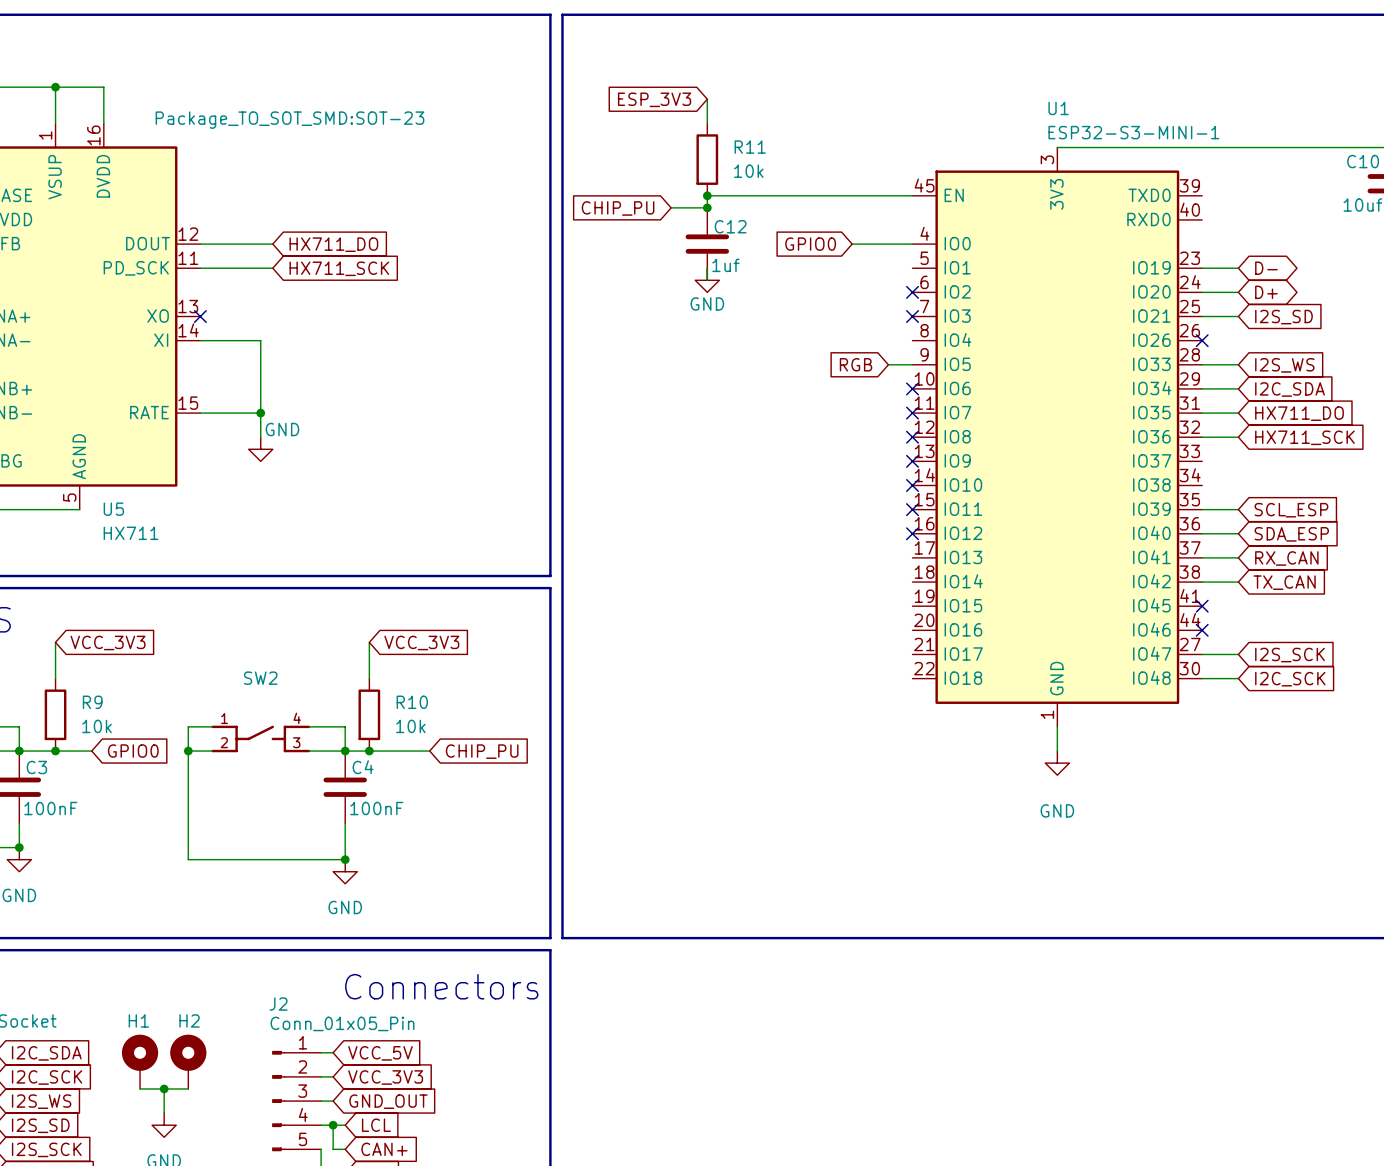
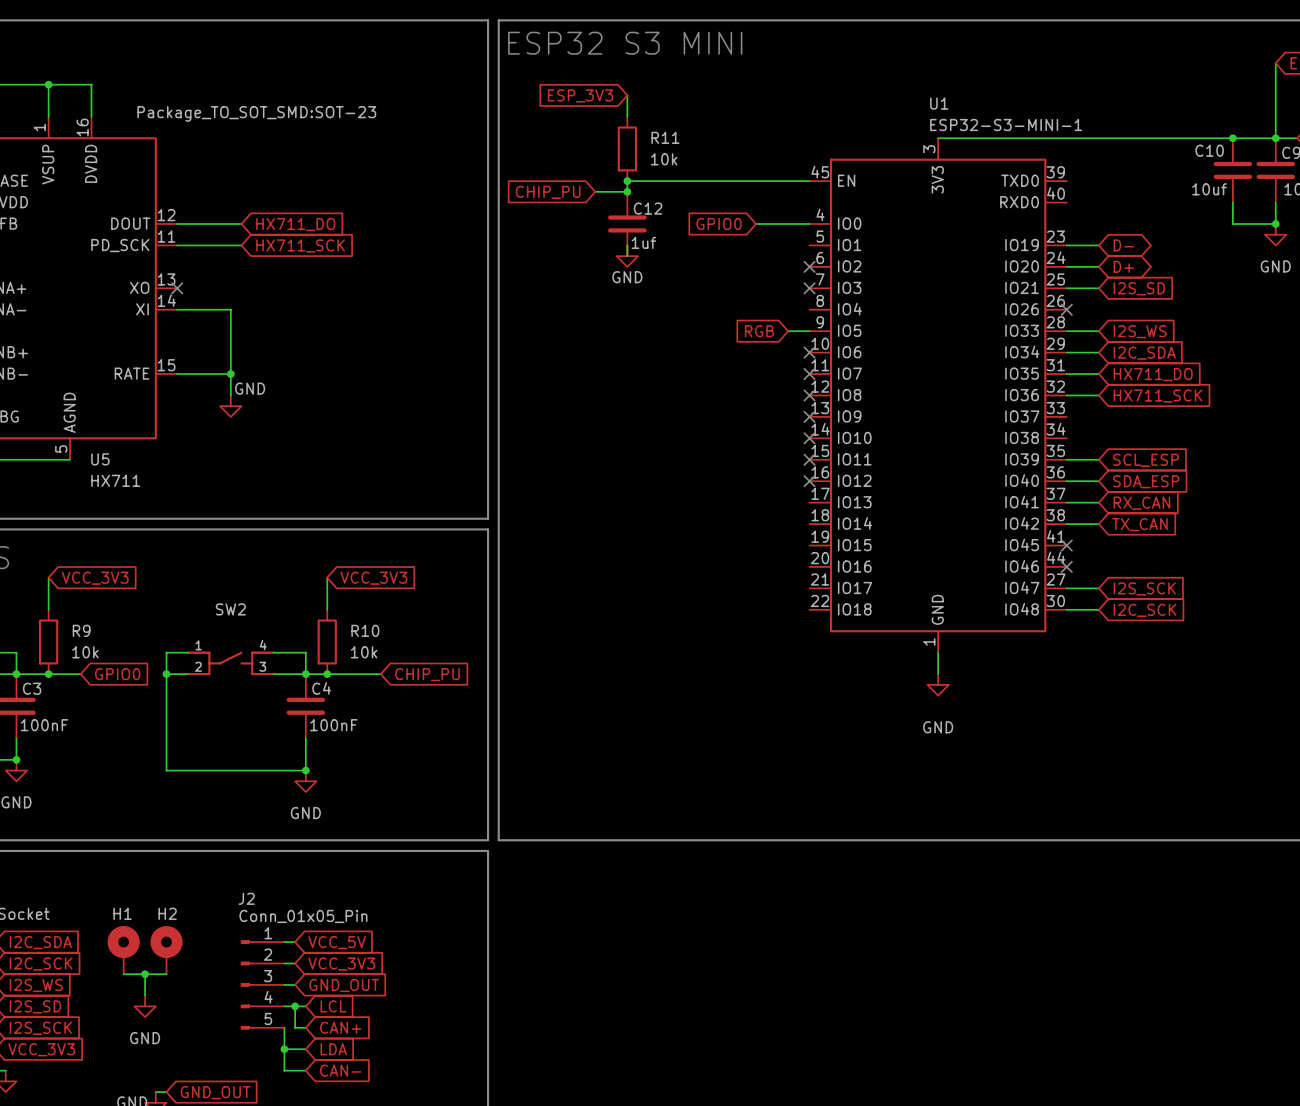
text: none -> ESP32 S3 MINI (625, 43)
text: Connectors (441, 986) -> none

